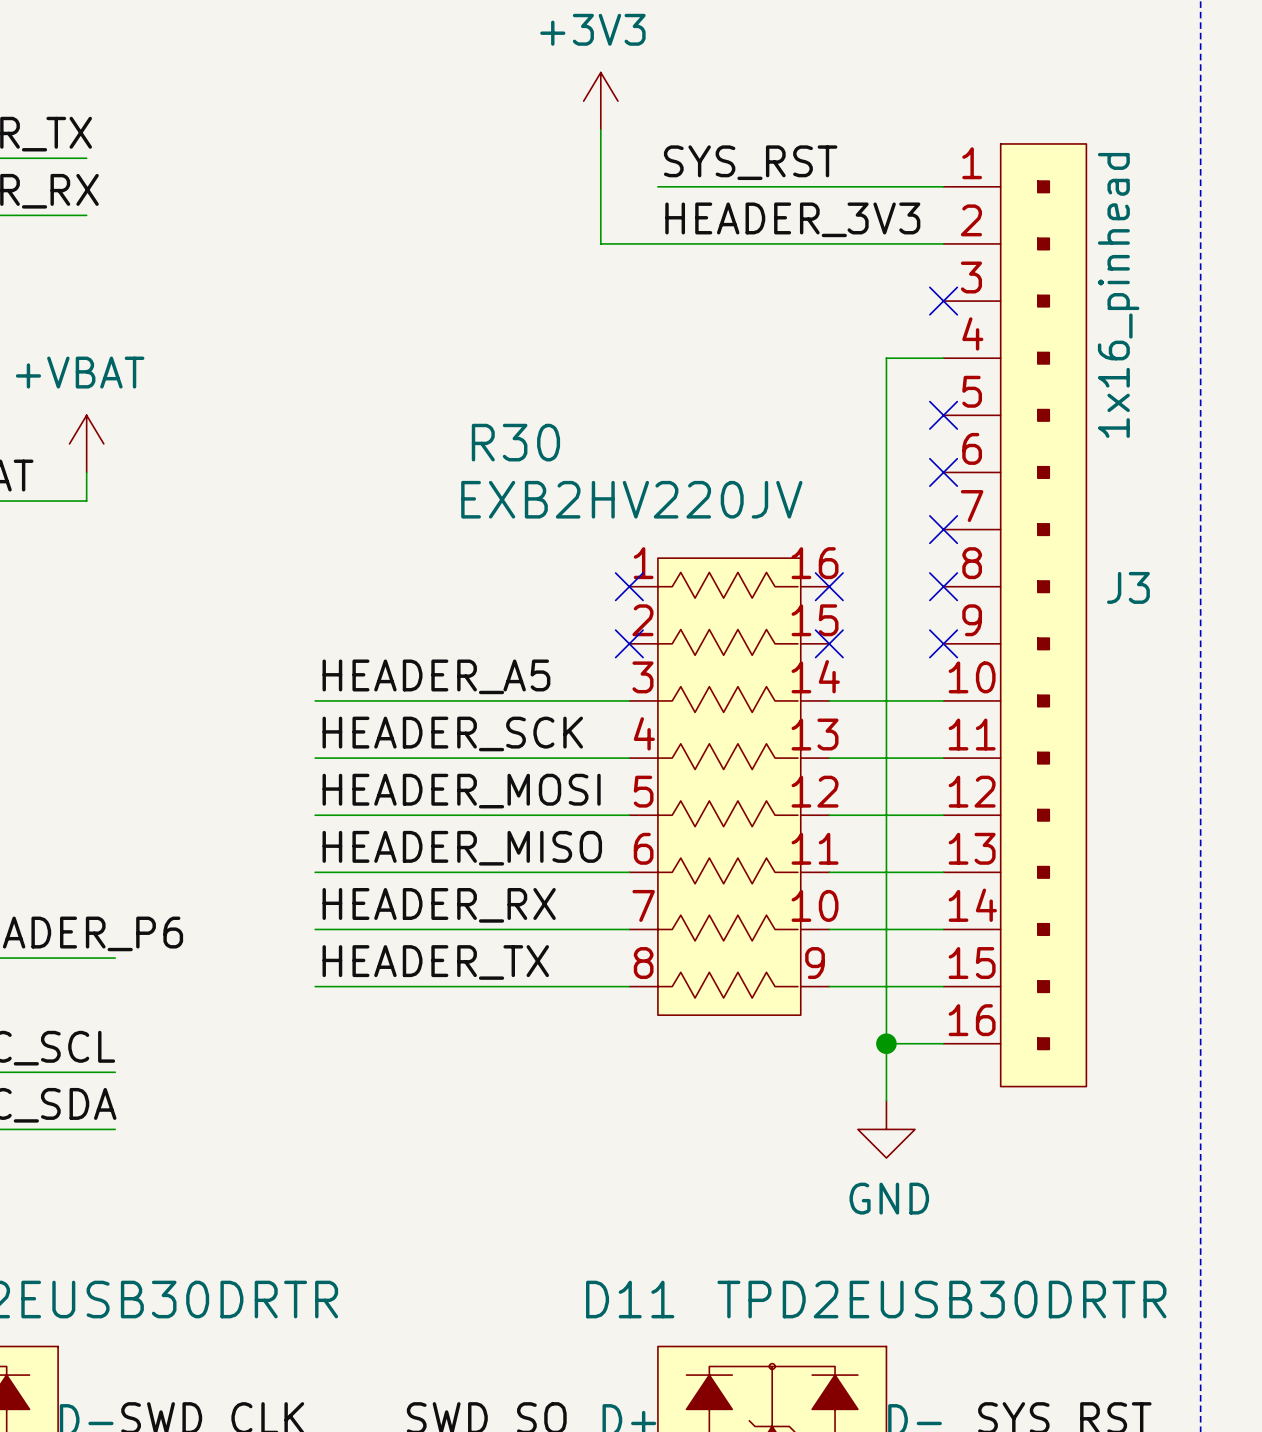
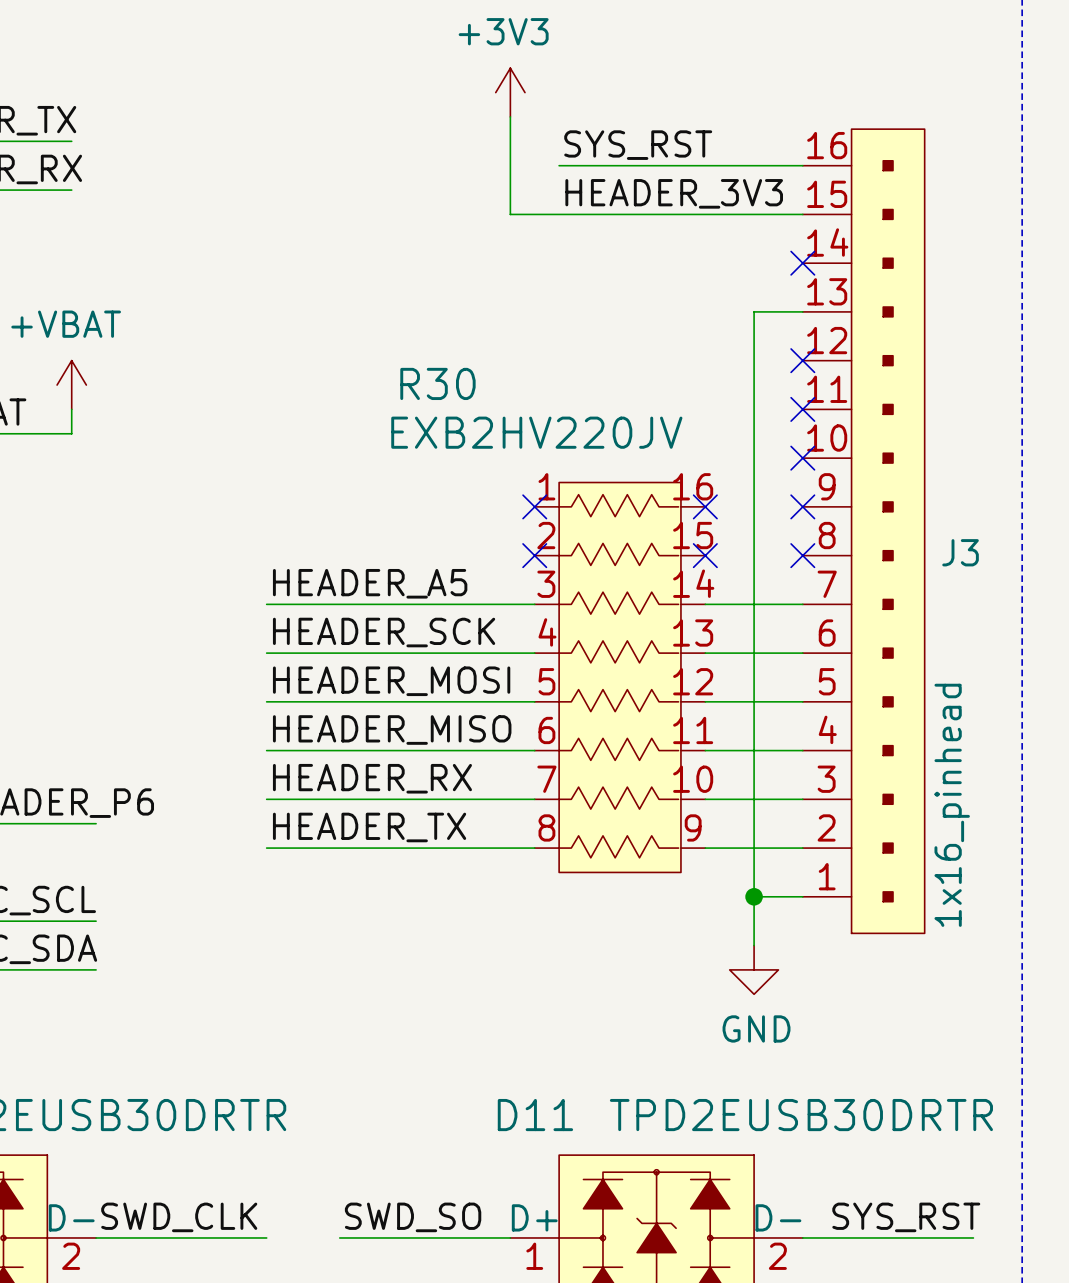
J3 flip: as is (1043, 615) -> up-down (888, 531)

